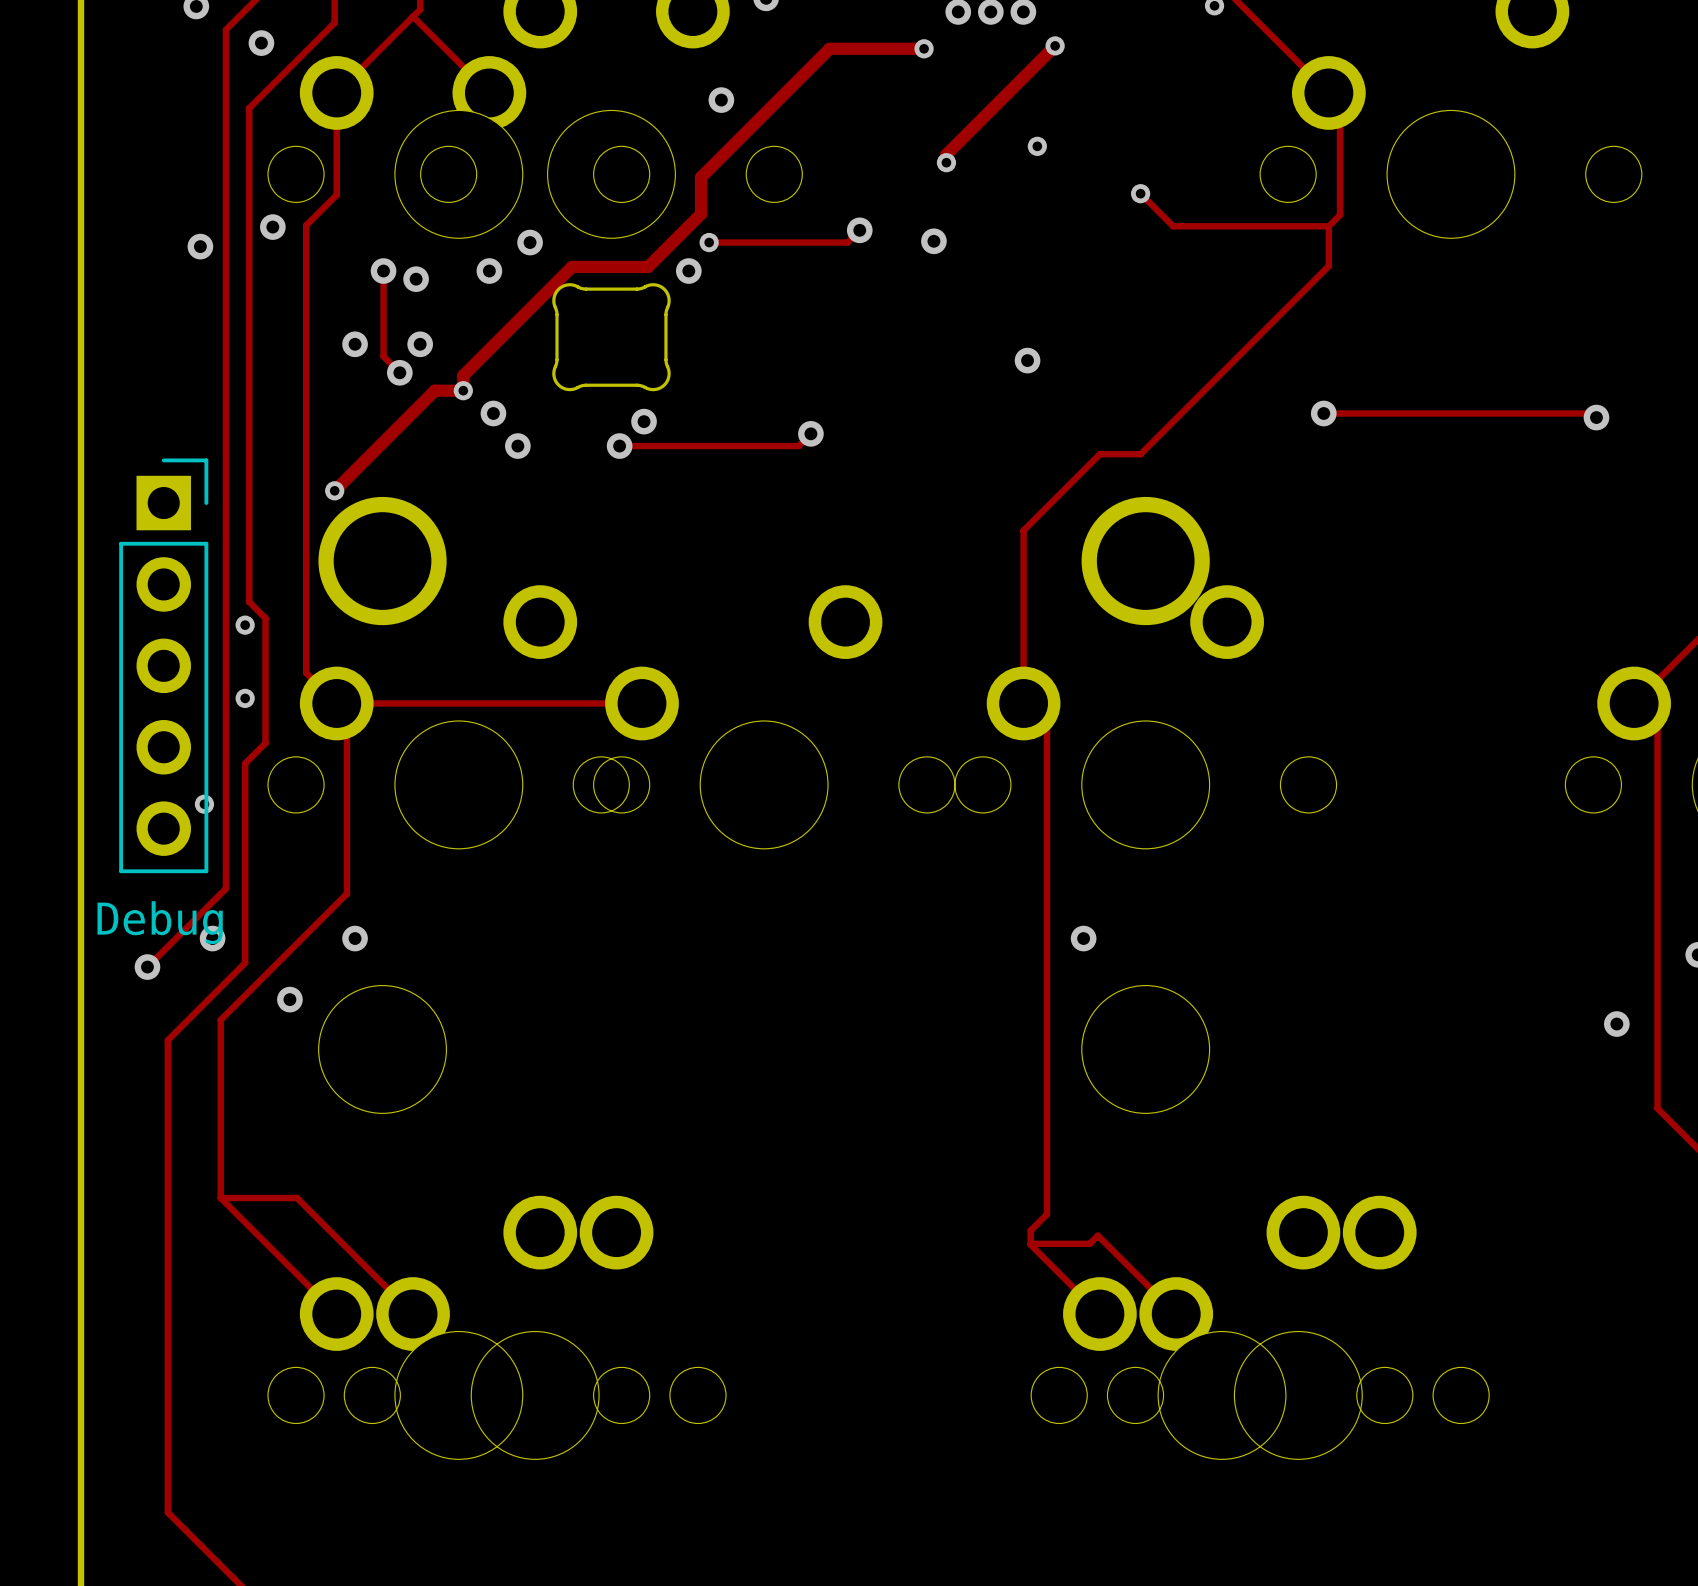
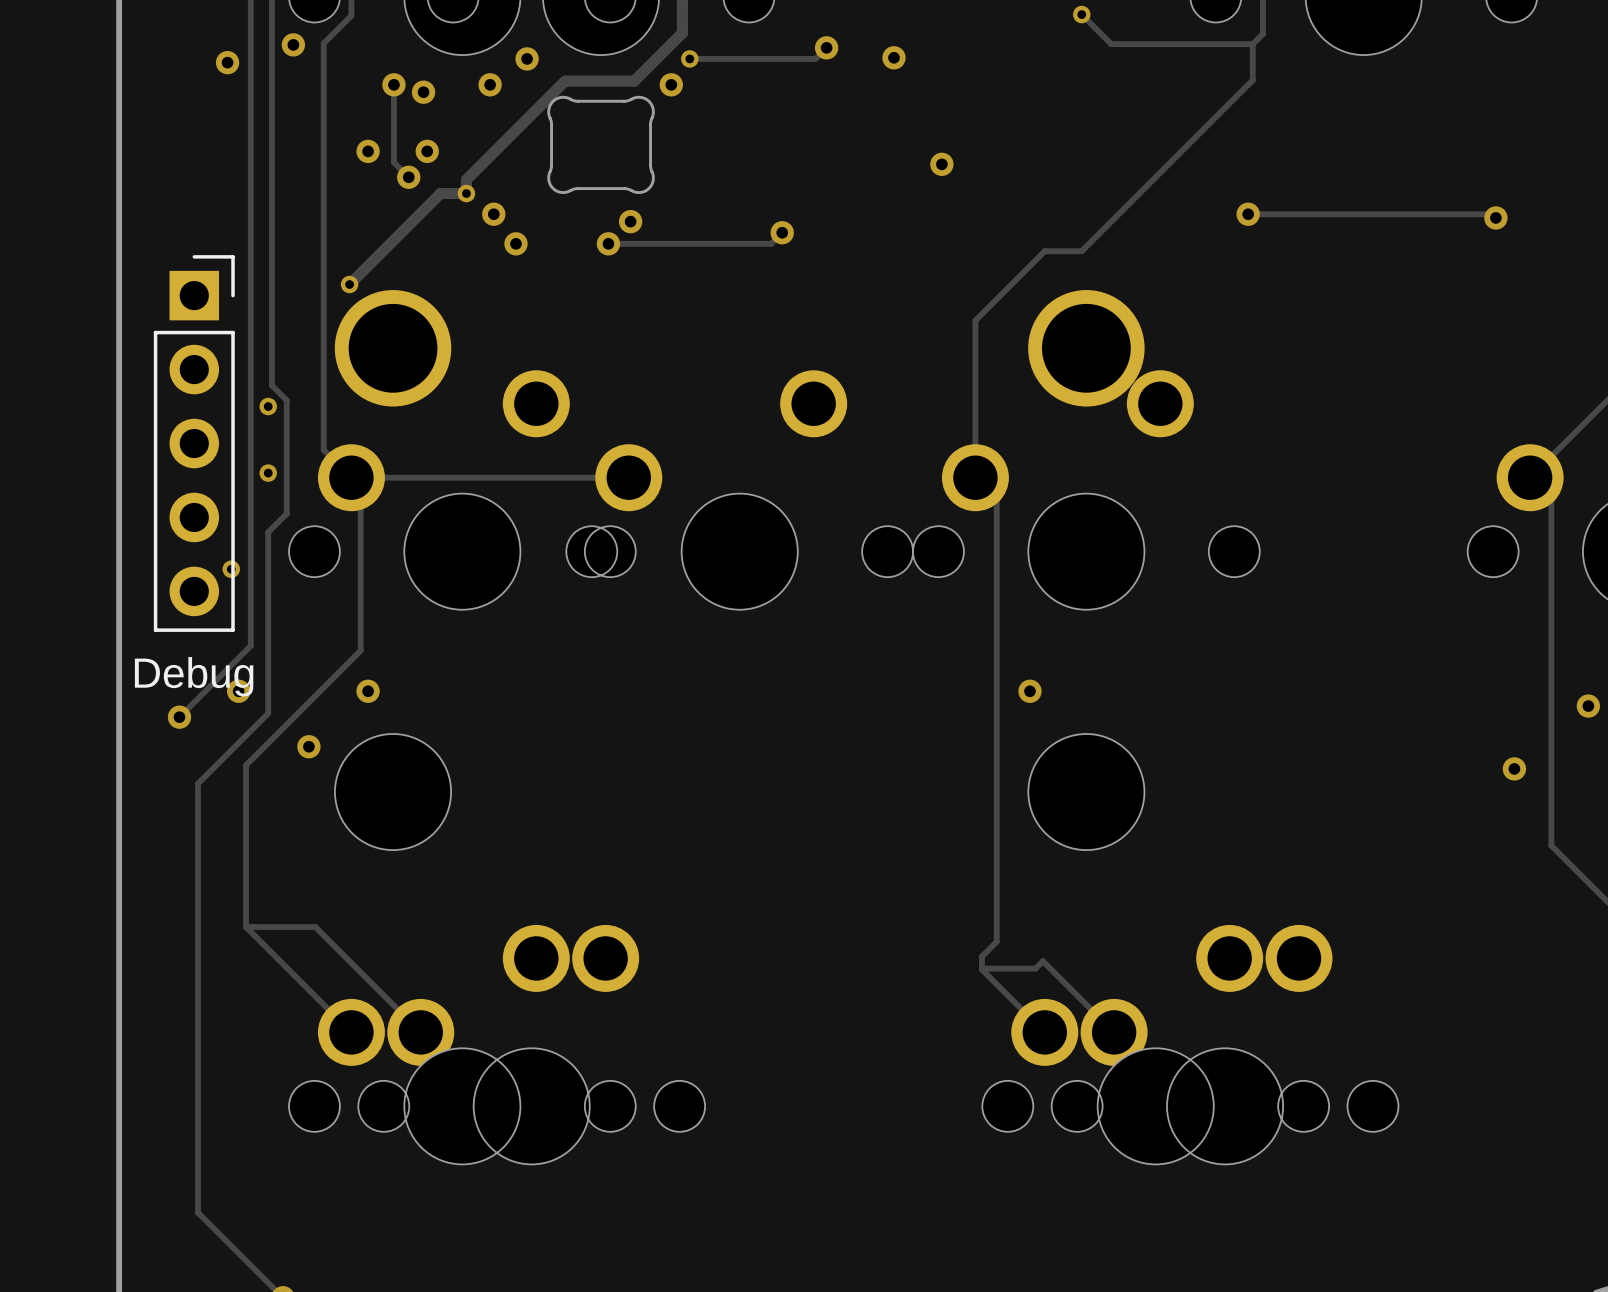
via position: (1027, 360) -> (941, 164)

